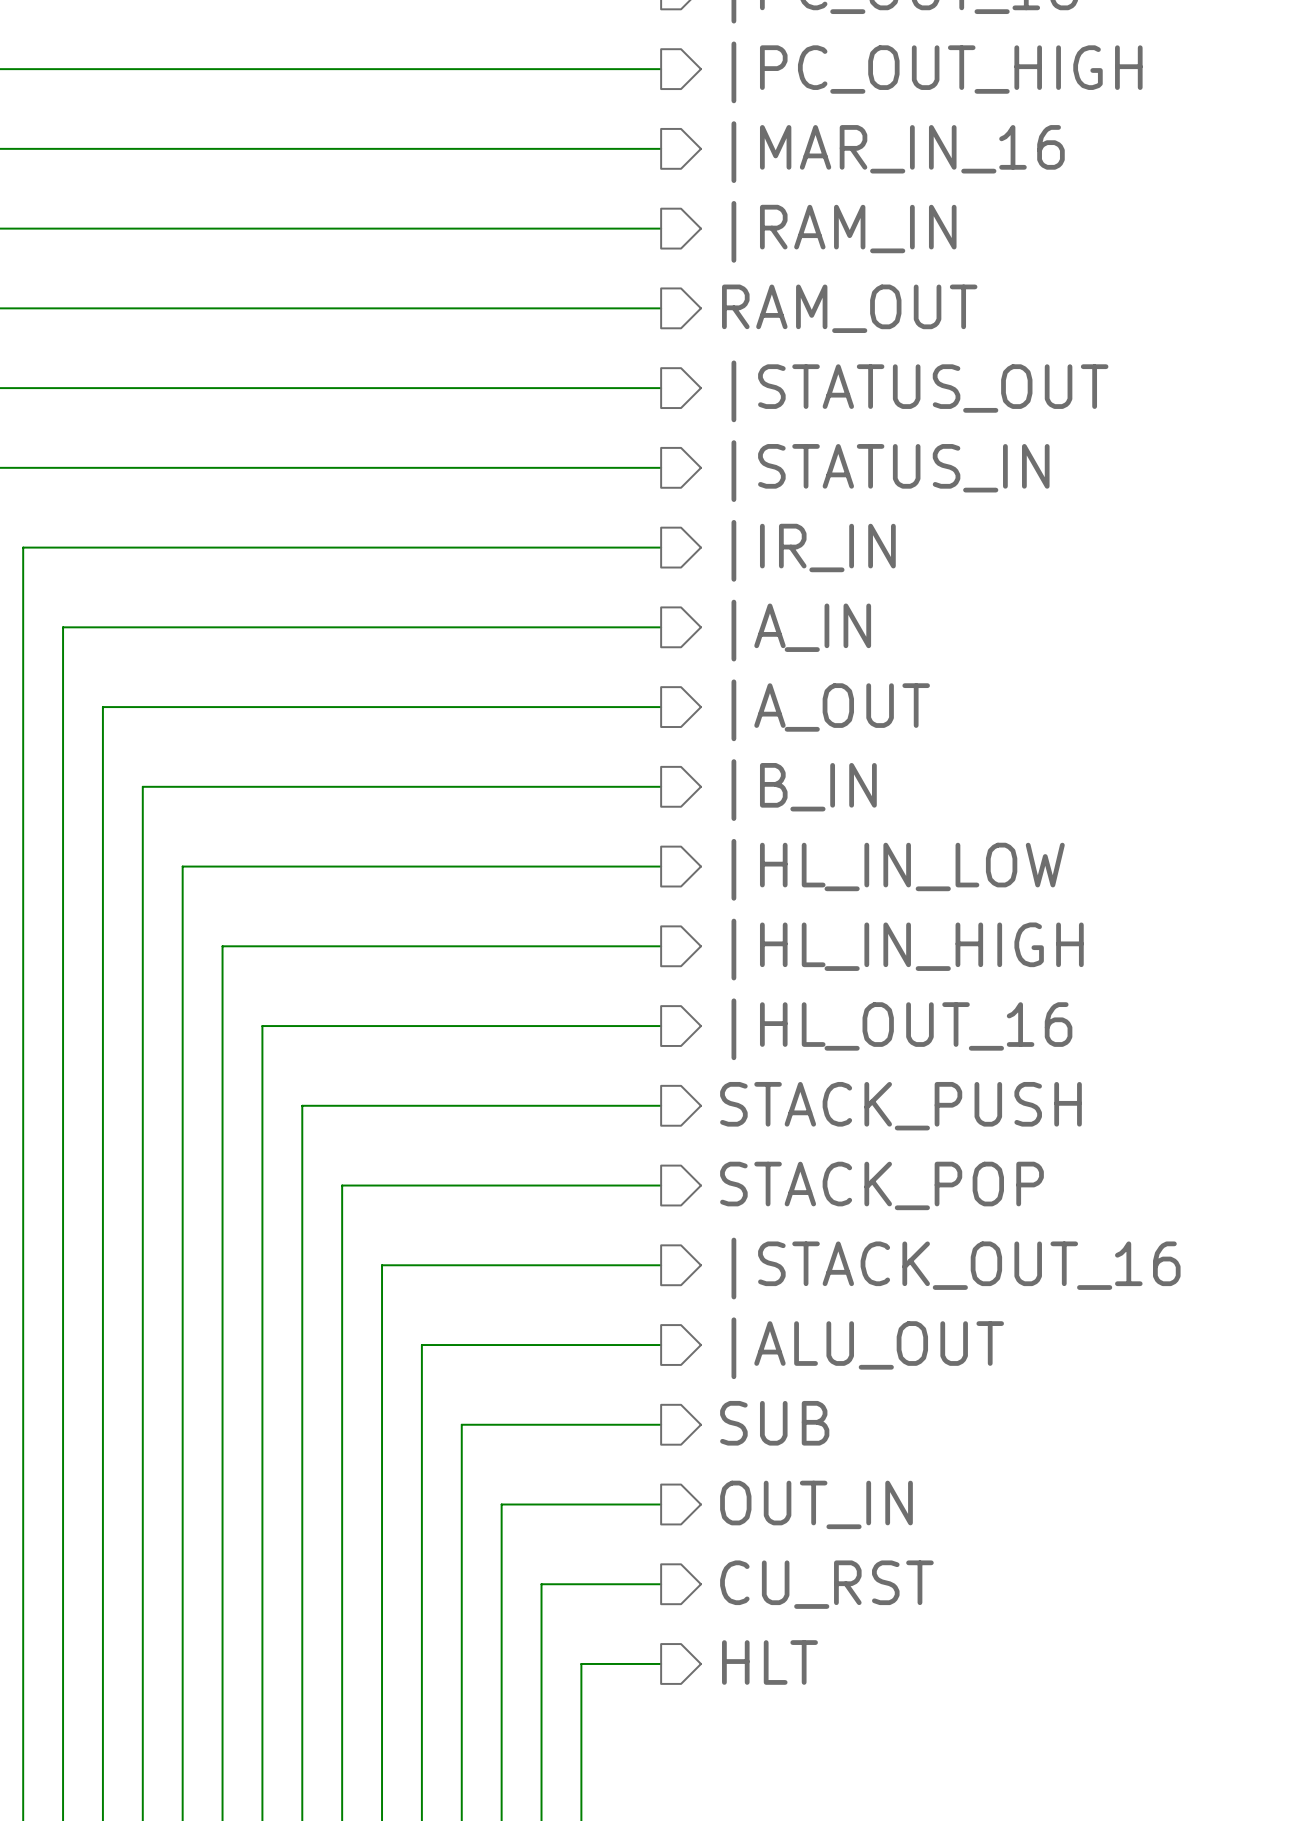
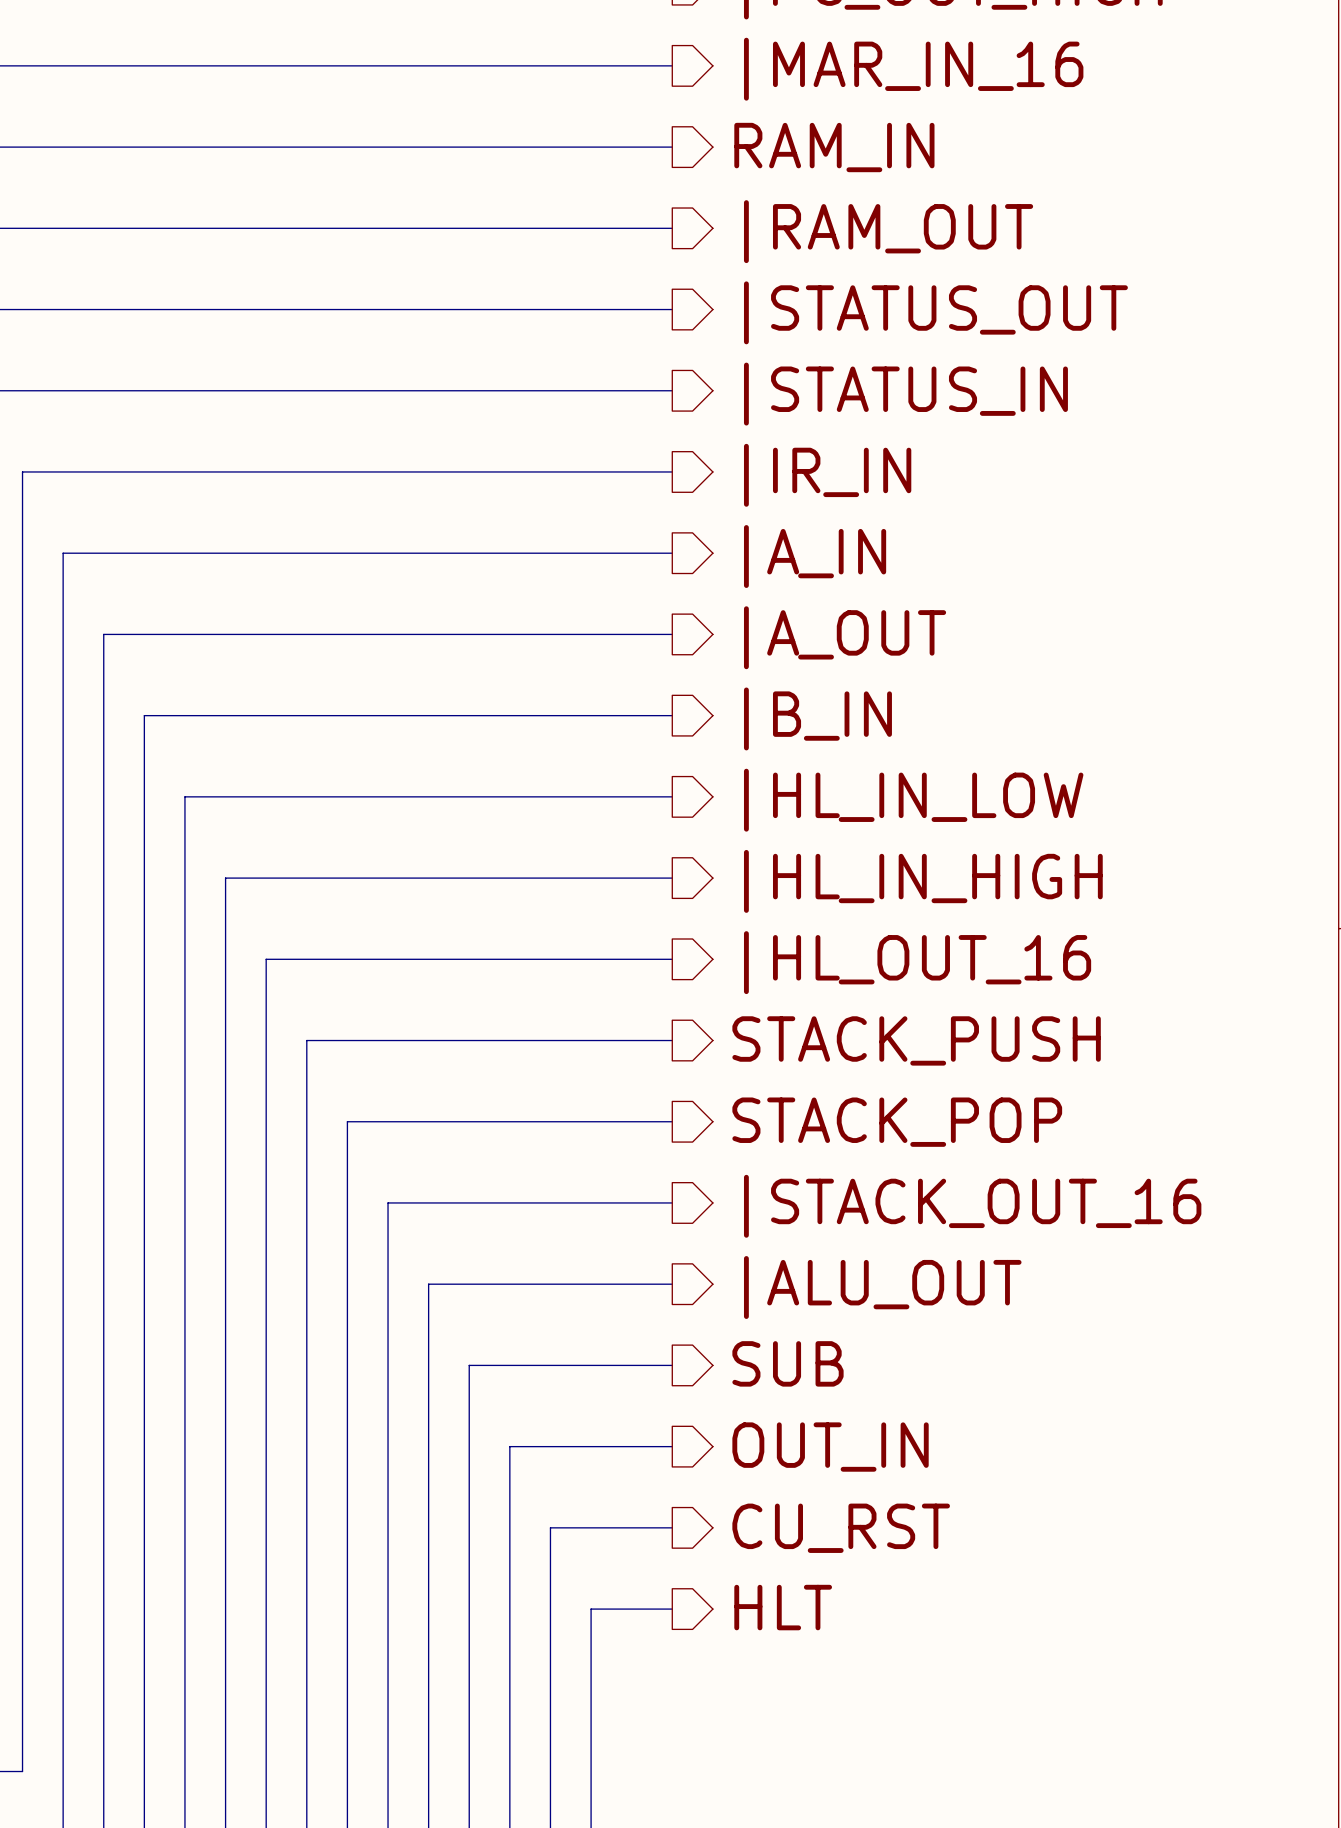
hierarchical label: |RAM_IN (844, 231) -> RAM_IN (834, 147)
hierarchical label: RAM_OUT (849, 308) -> |RAM_OUT (888, 231)

